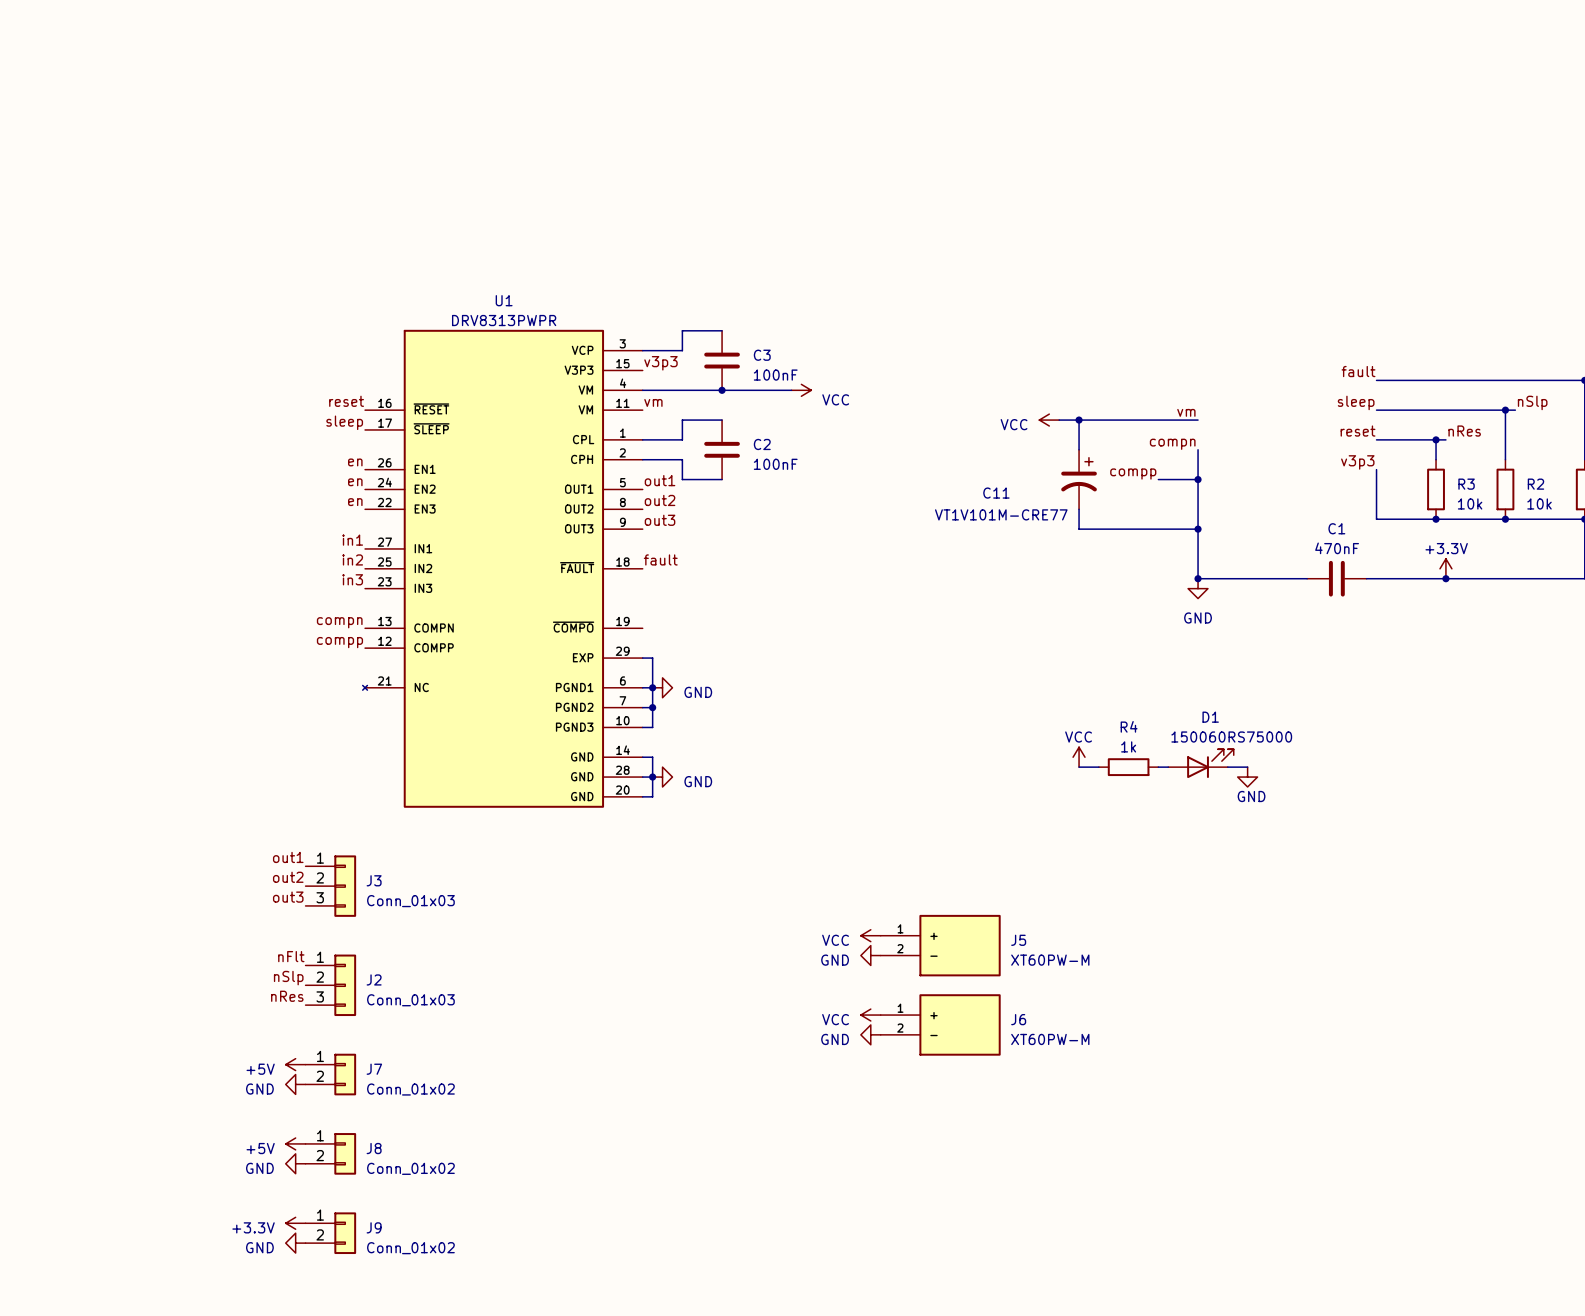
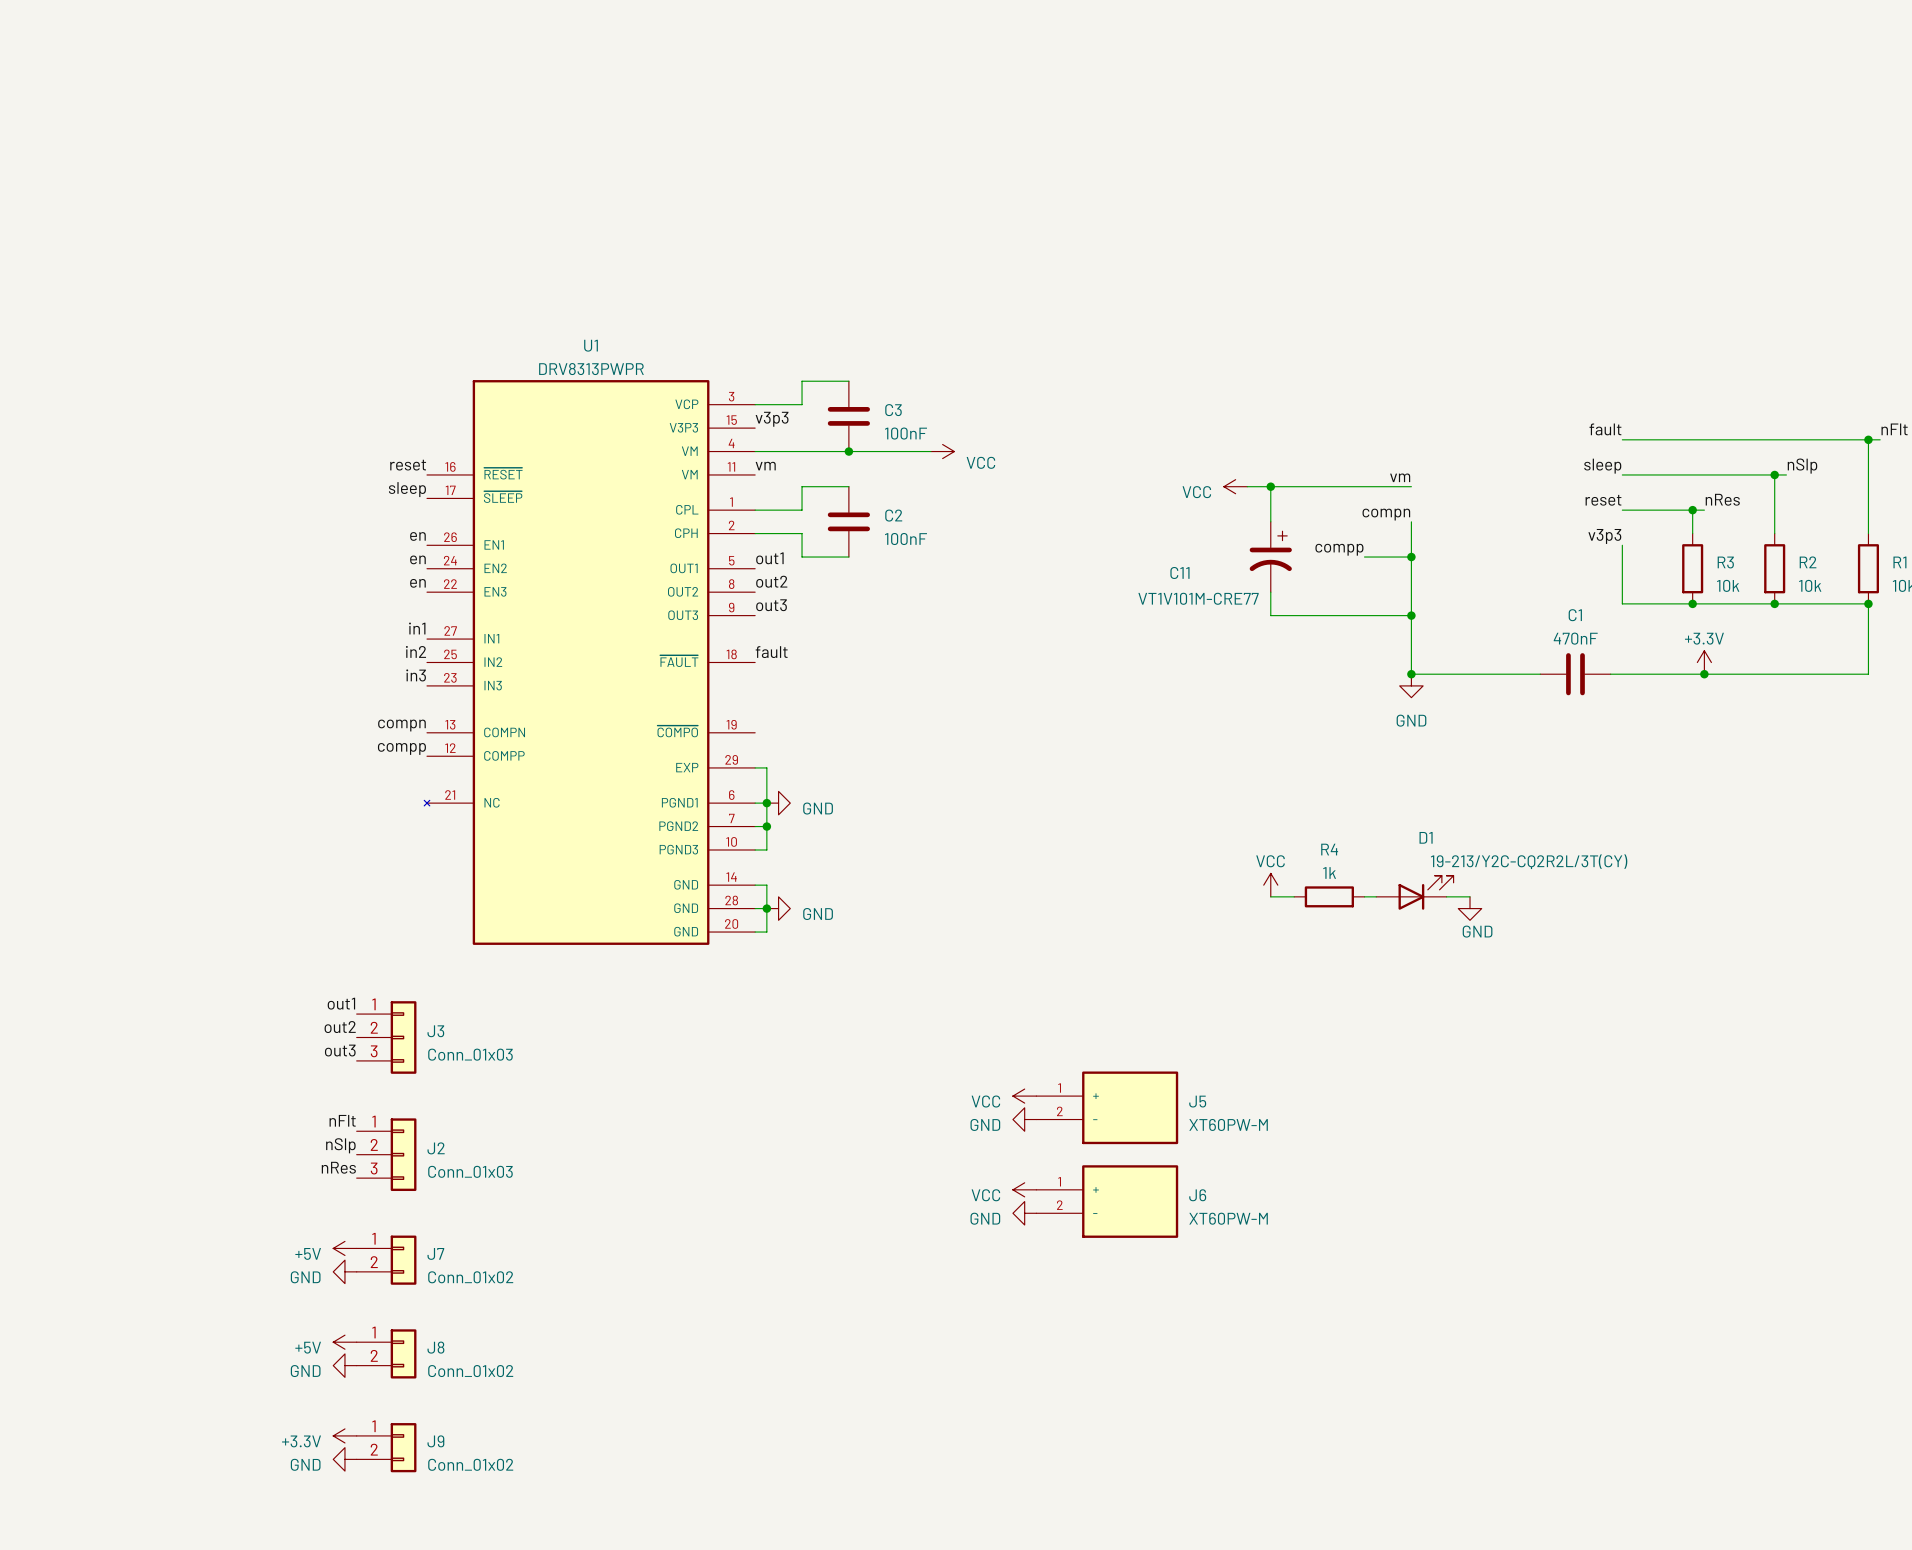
D1 value: 150060RS75000 (1231, 737) -> 19-213/Y2C-CQ2R2L/3T(CY) (1529, 861)

